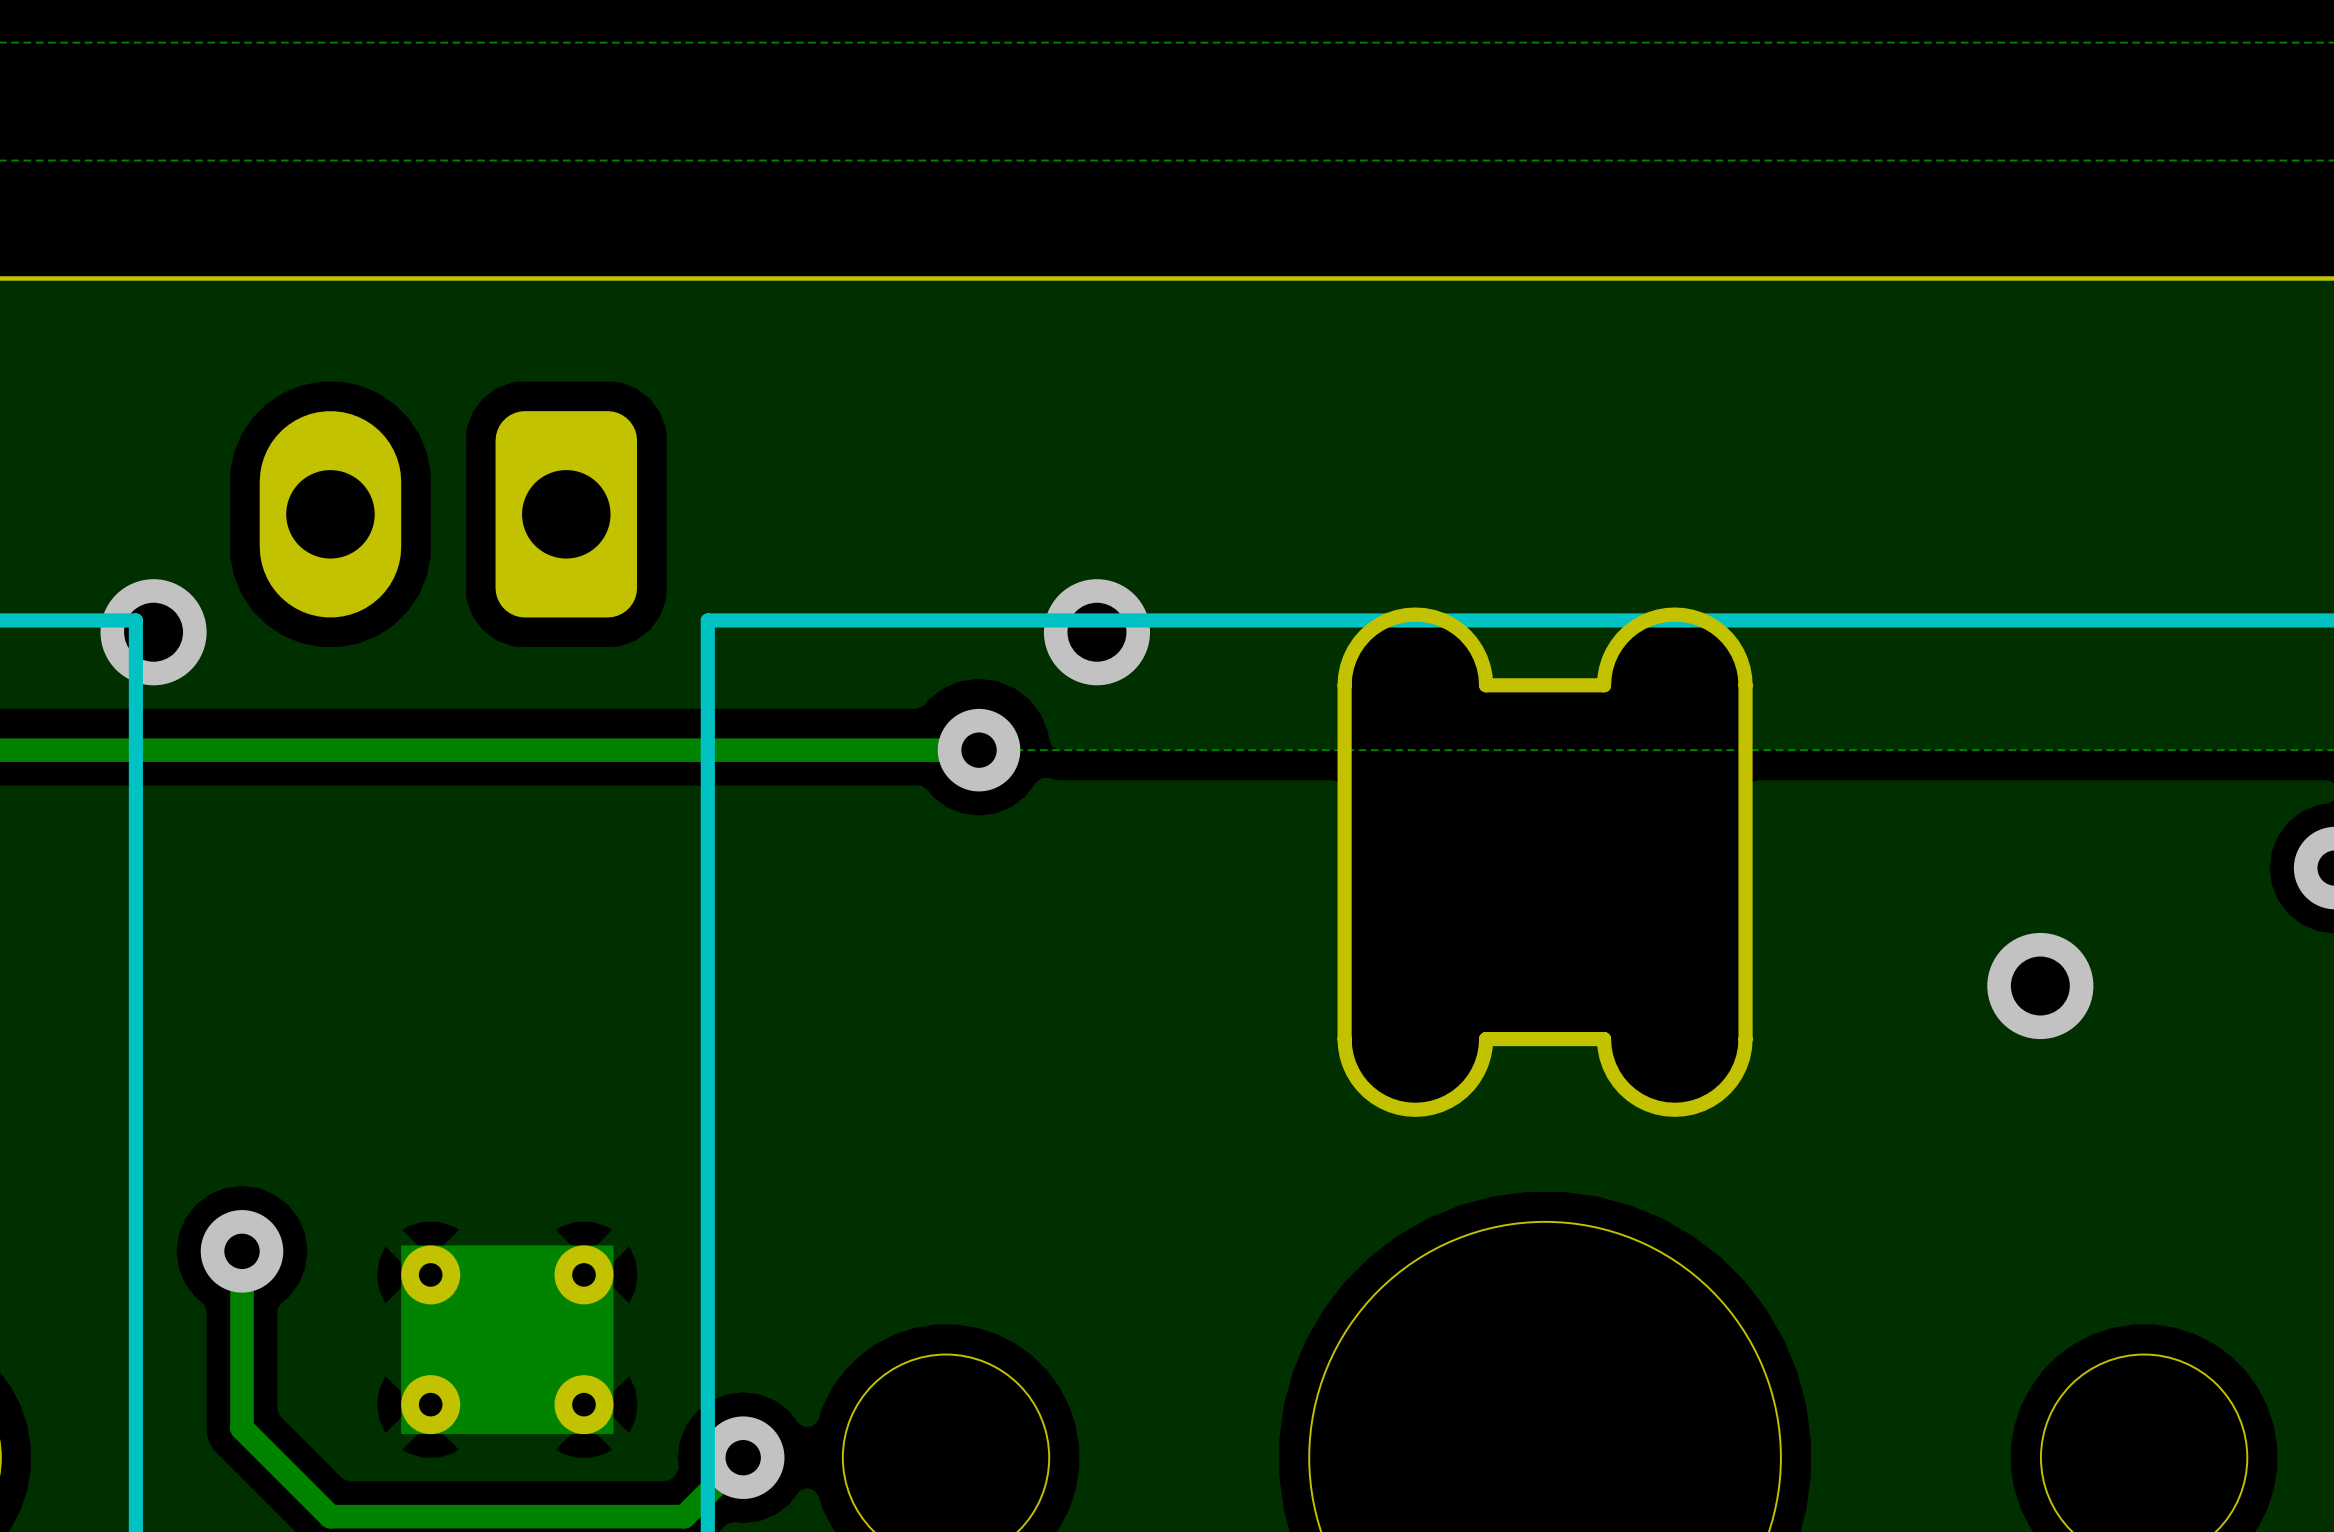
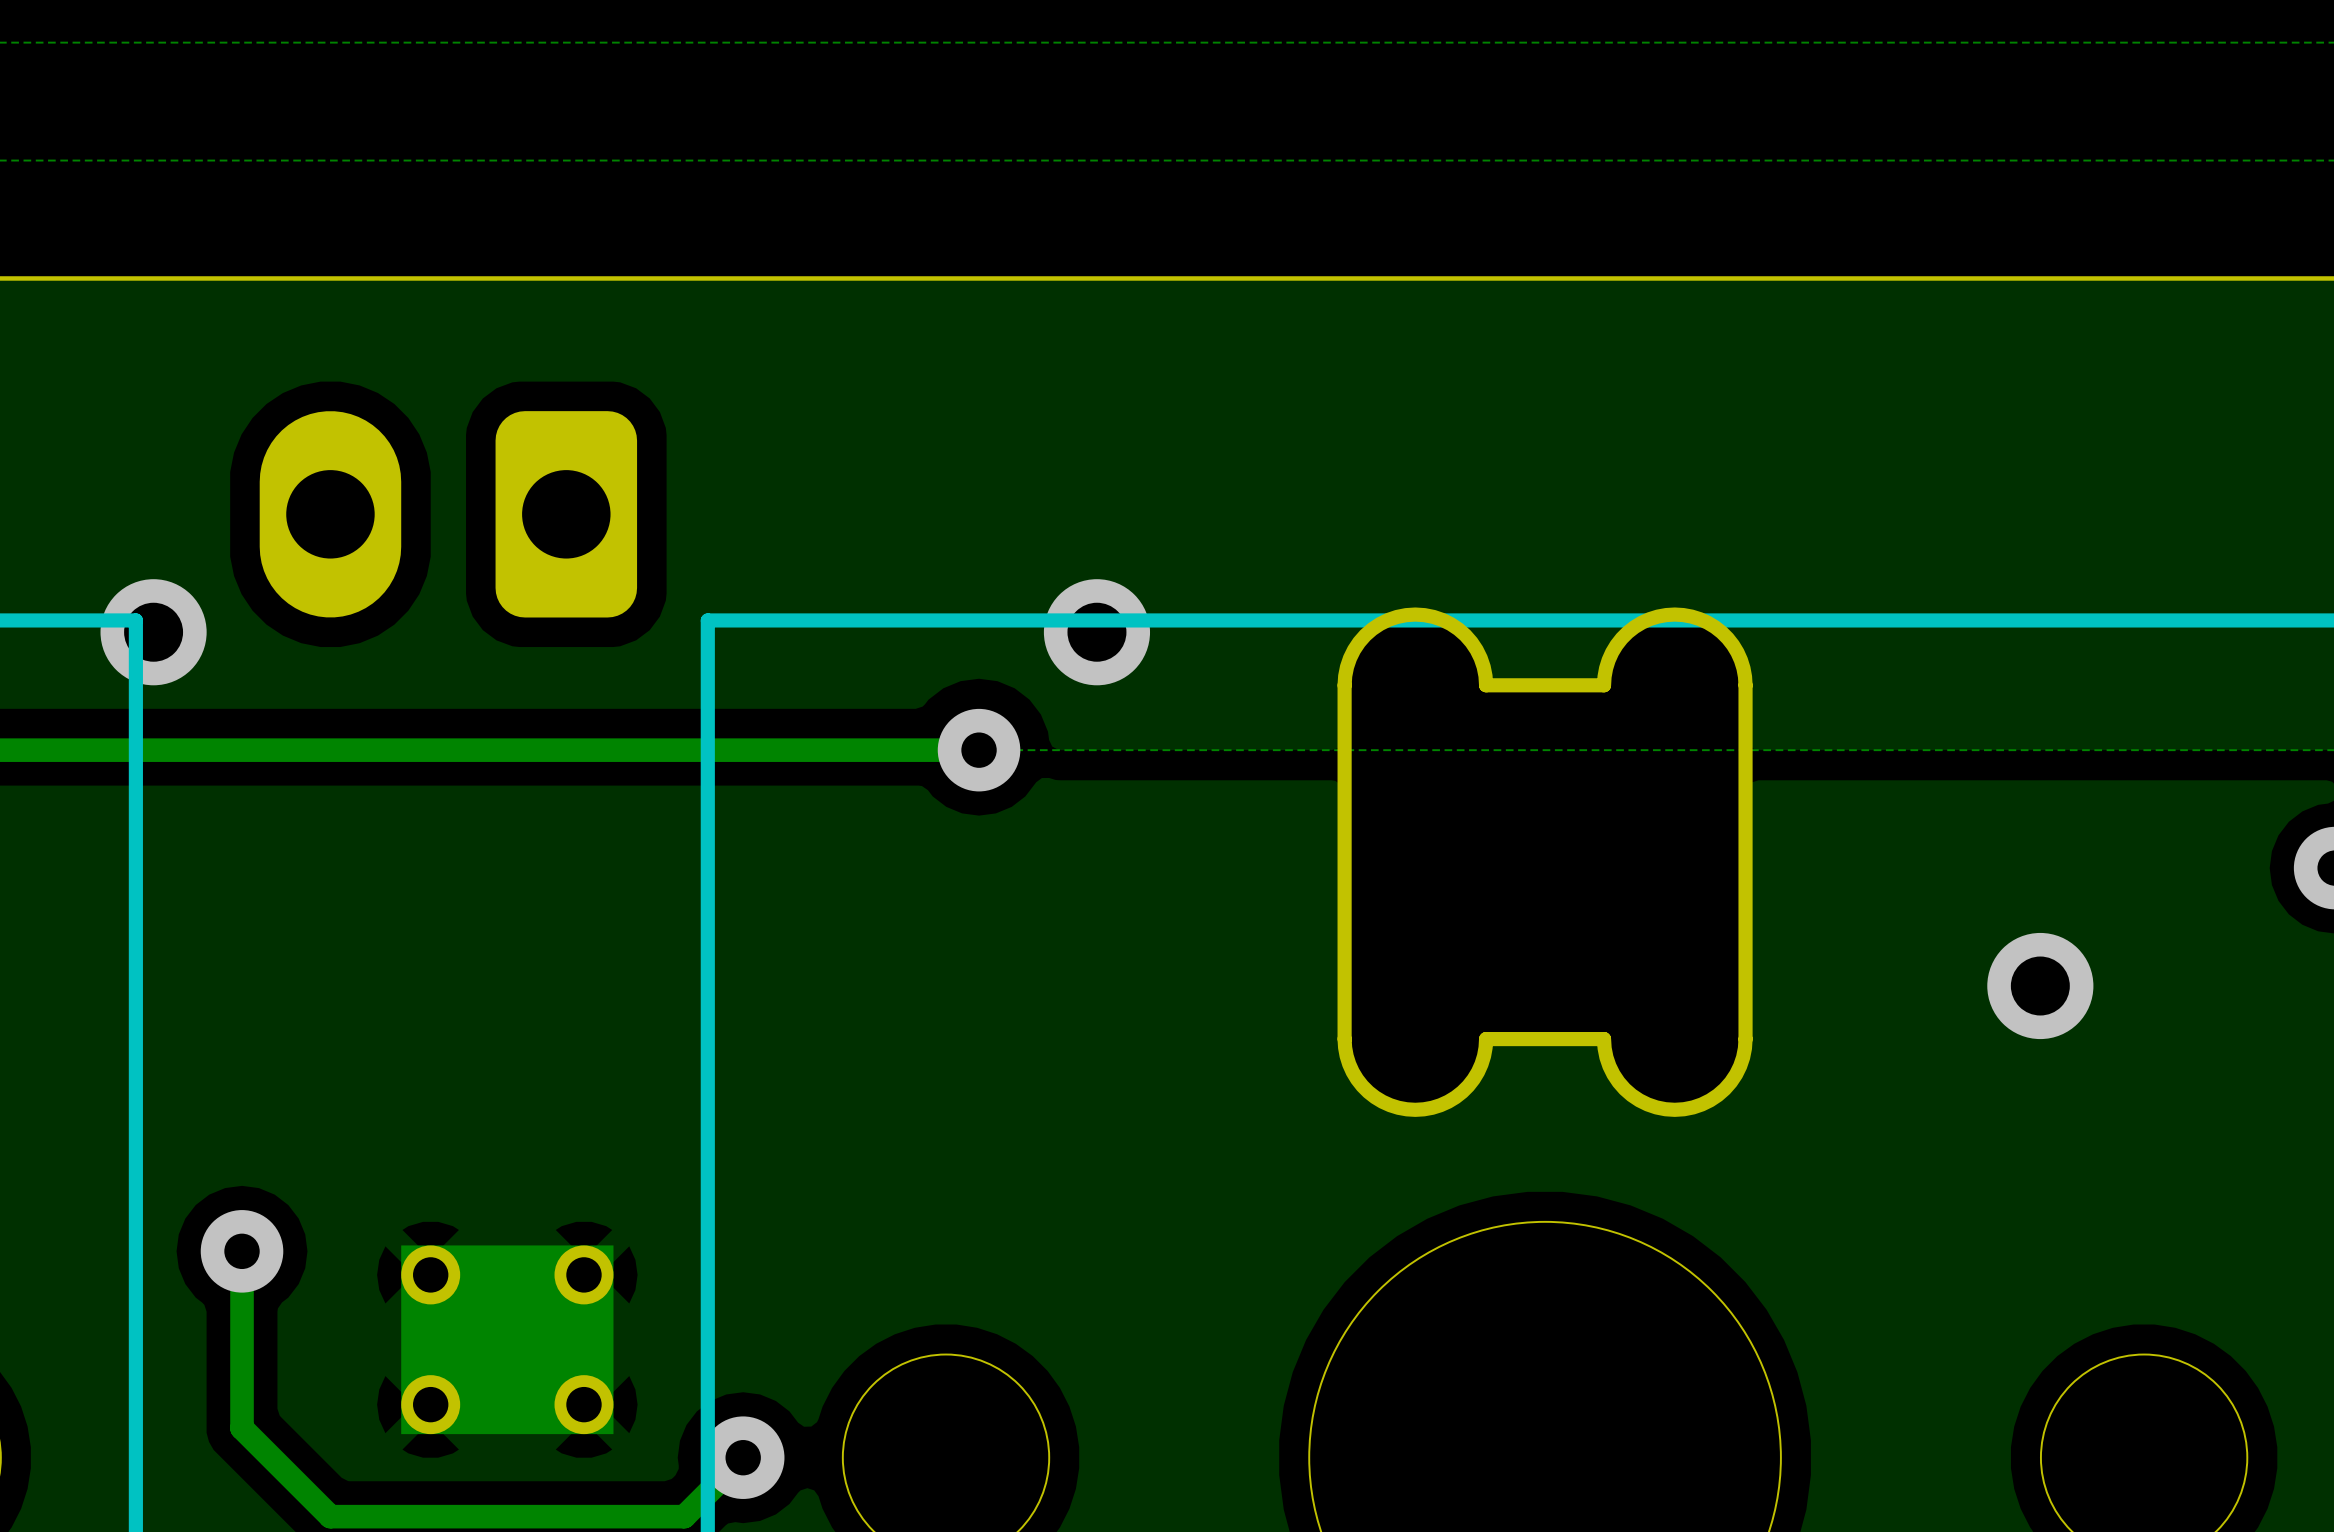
part footprint: [401, 1245, 614, 1435] -> [401, 1245, 614, 1435]

